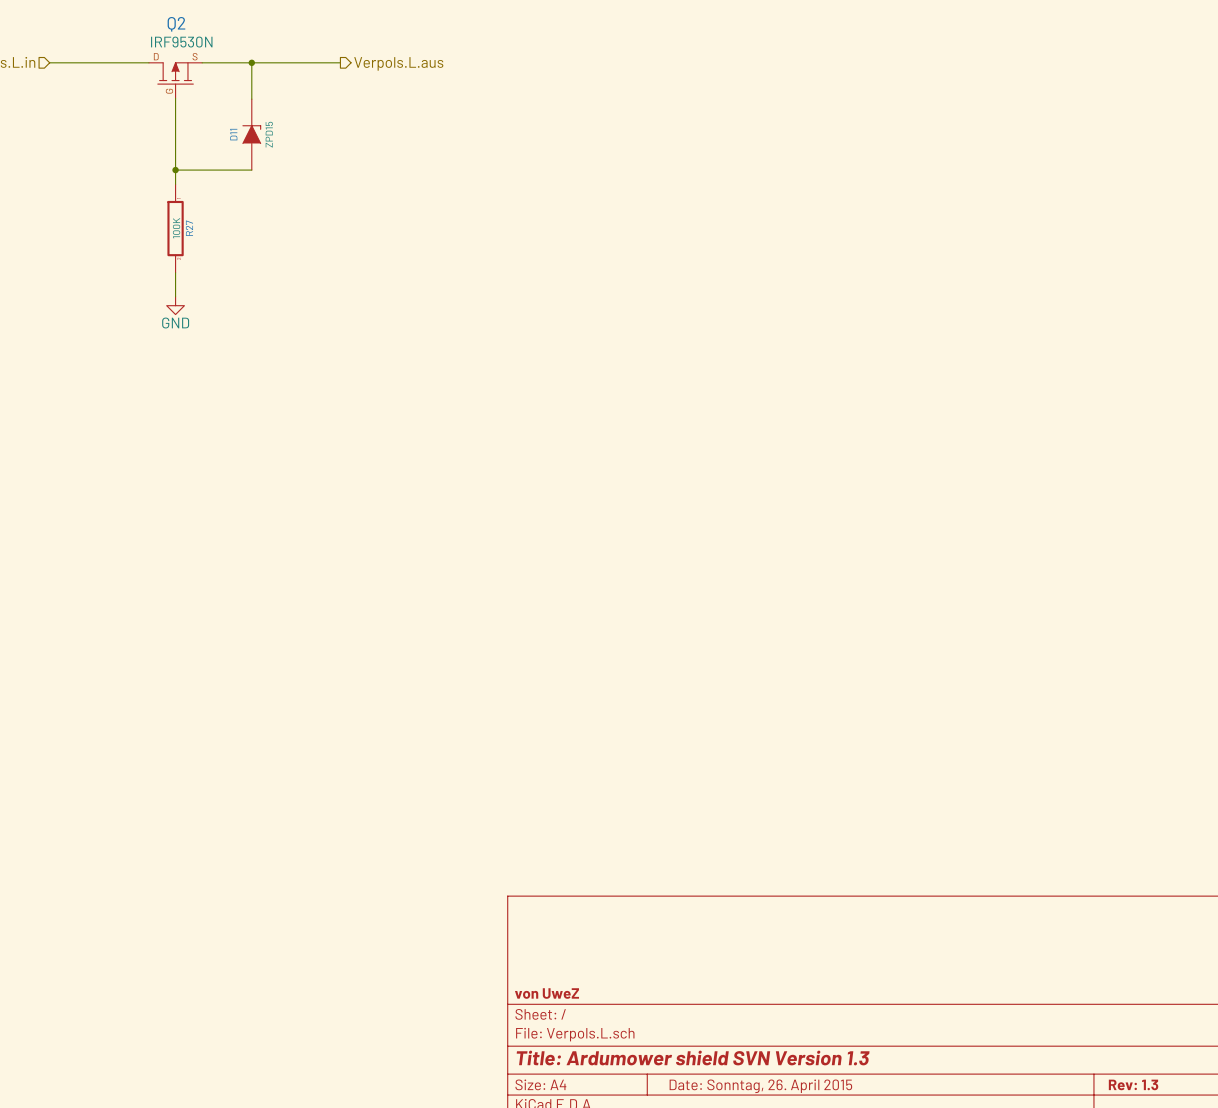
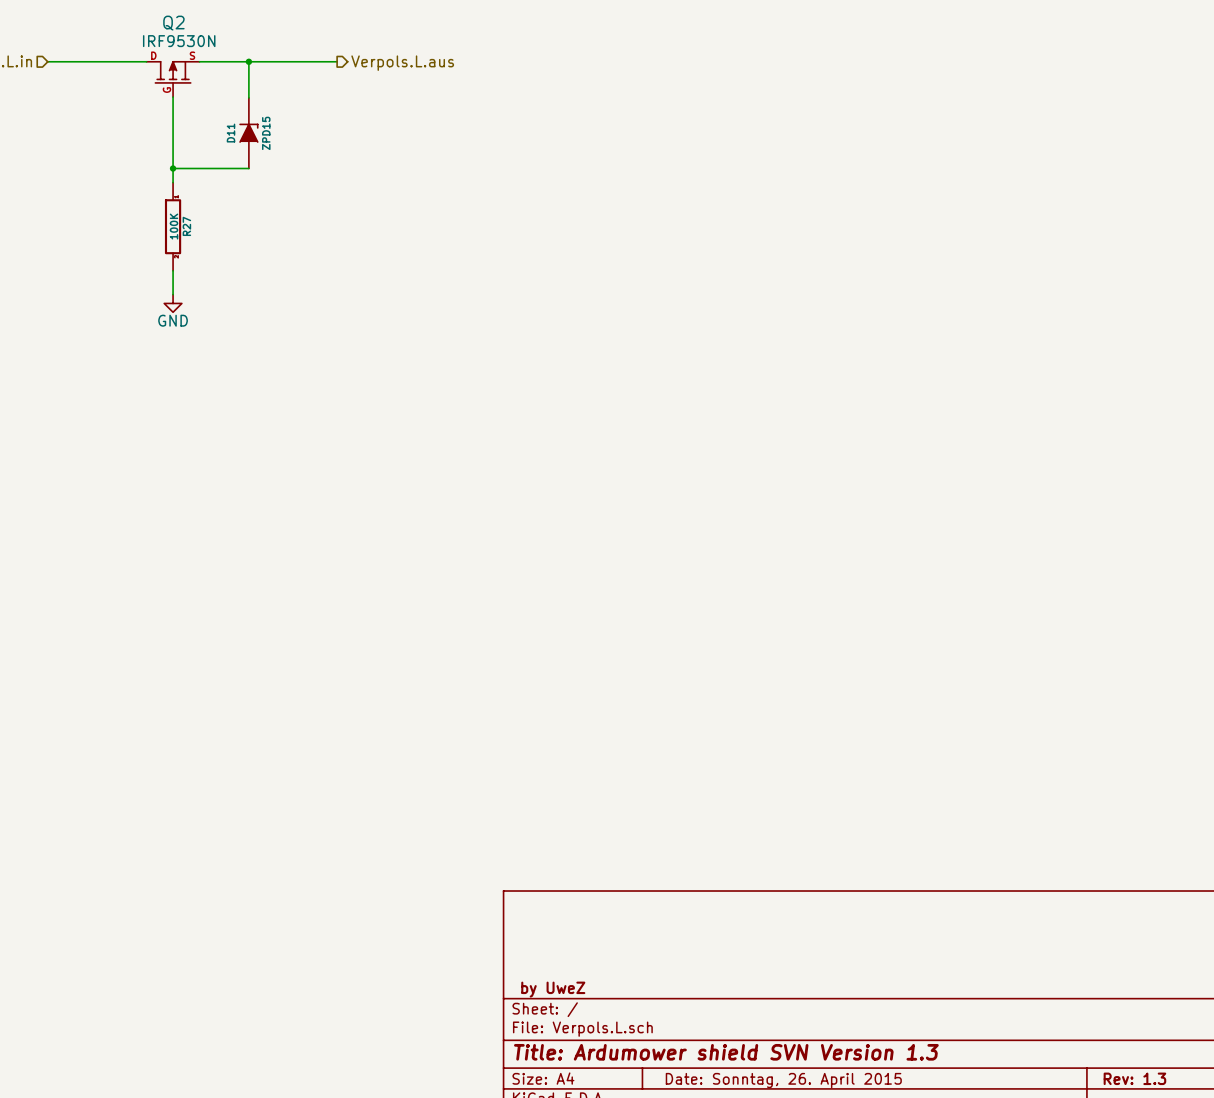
title block: von UweZ (547, 993) -> by UweZ (553, 989)

